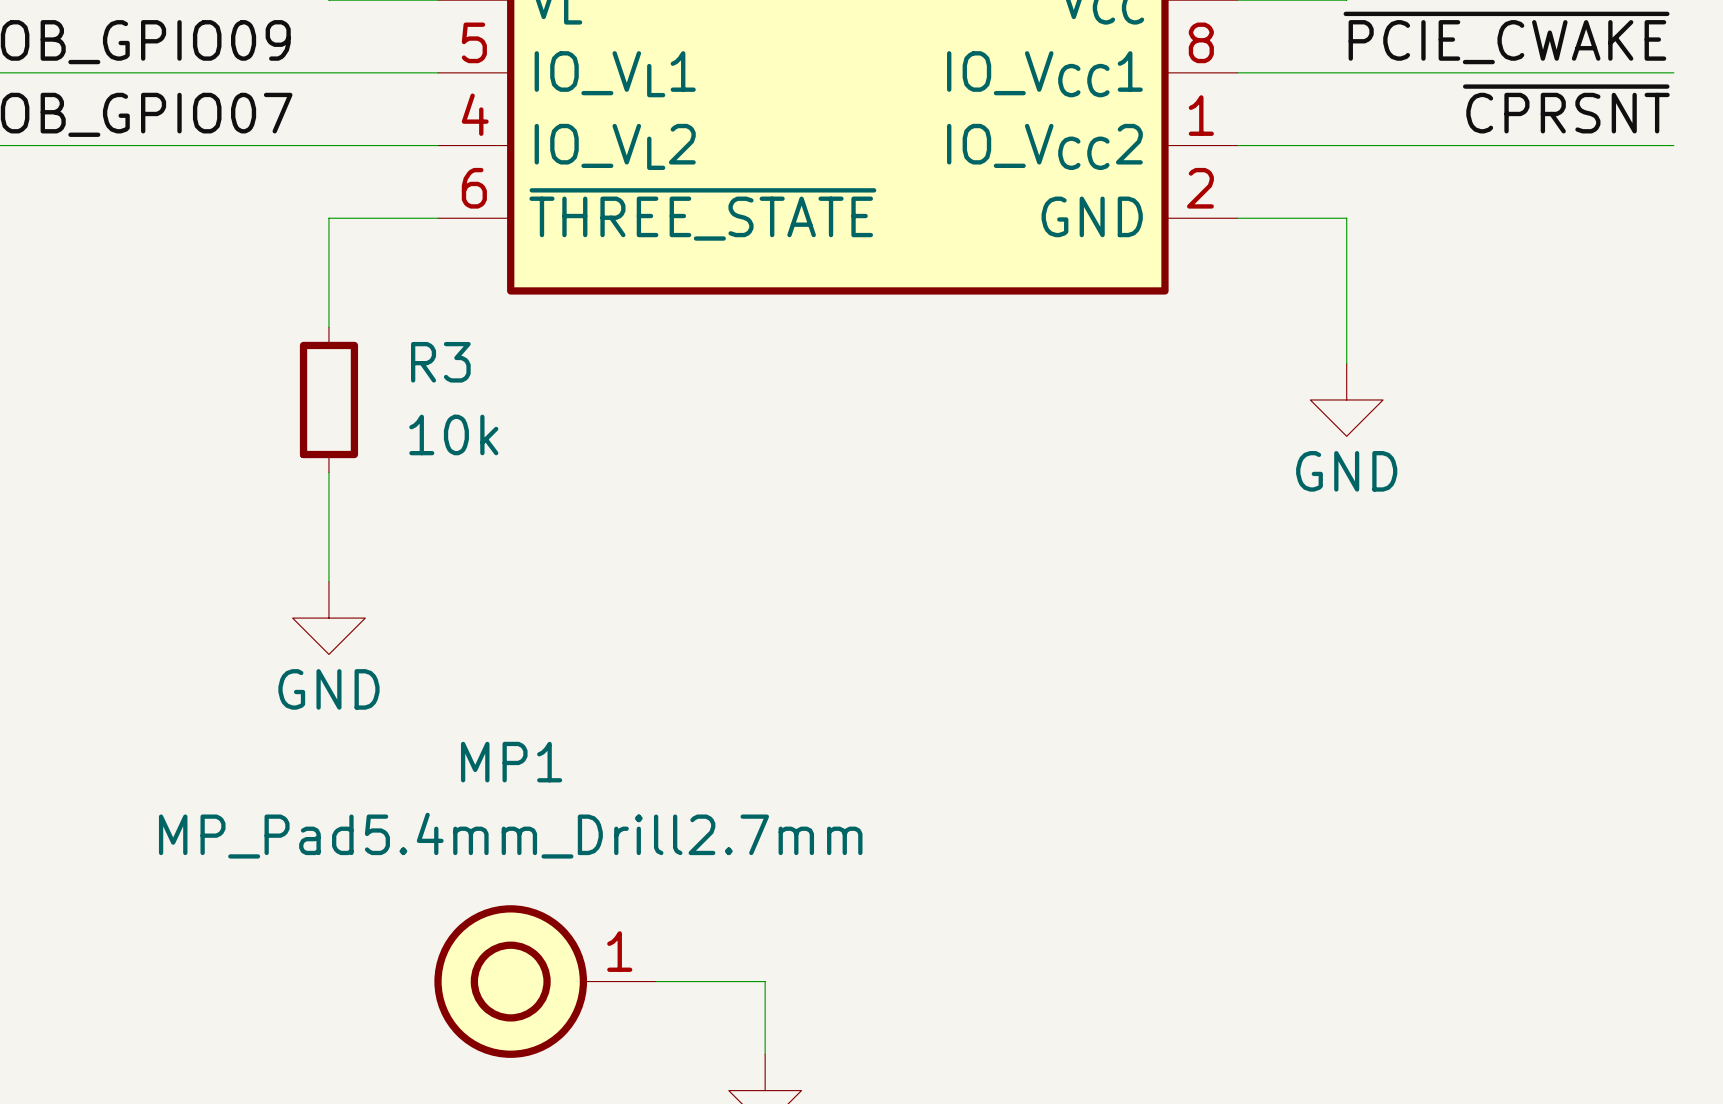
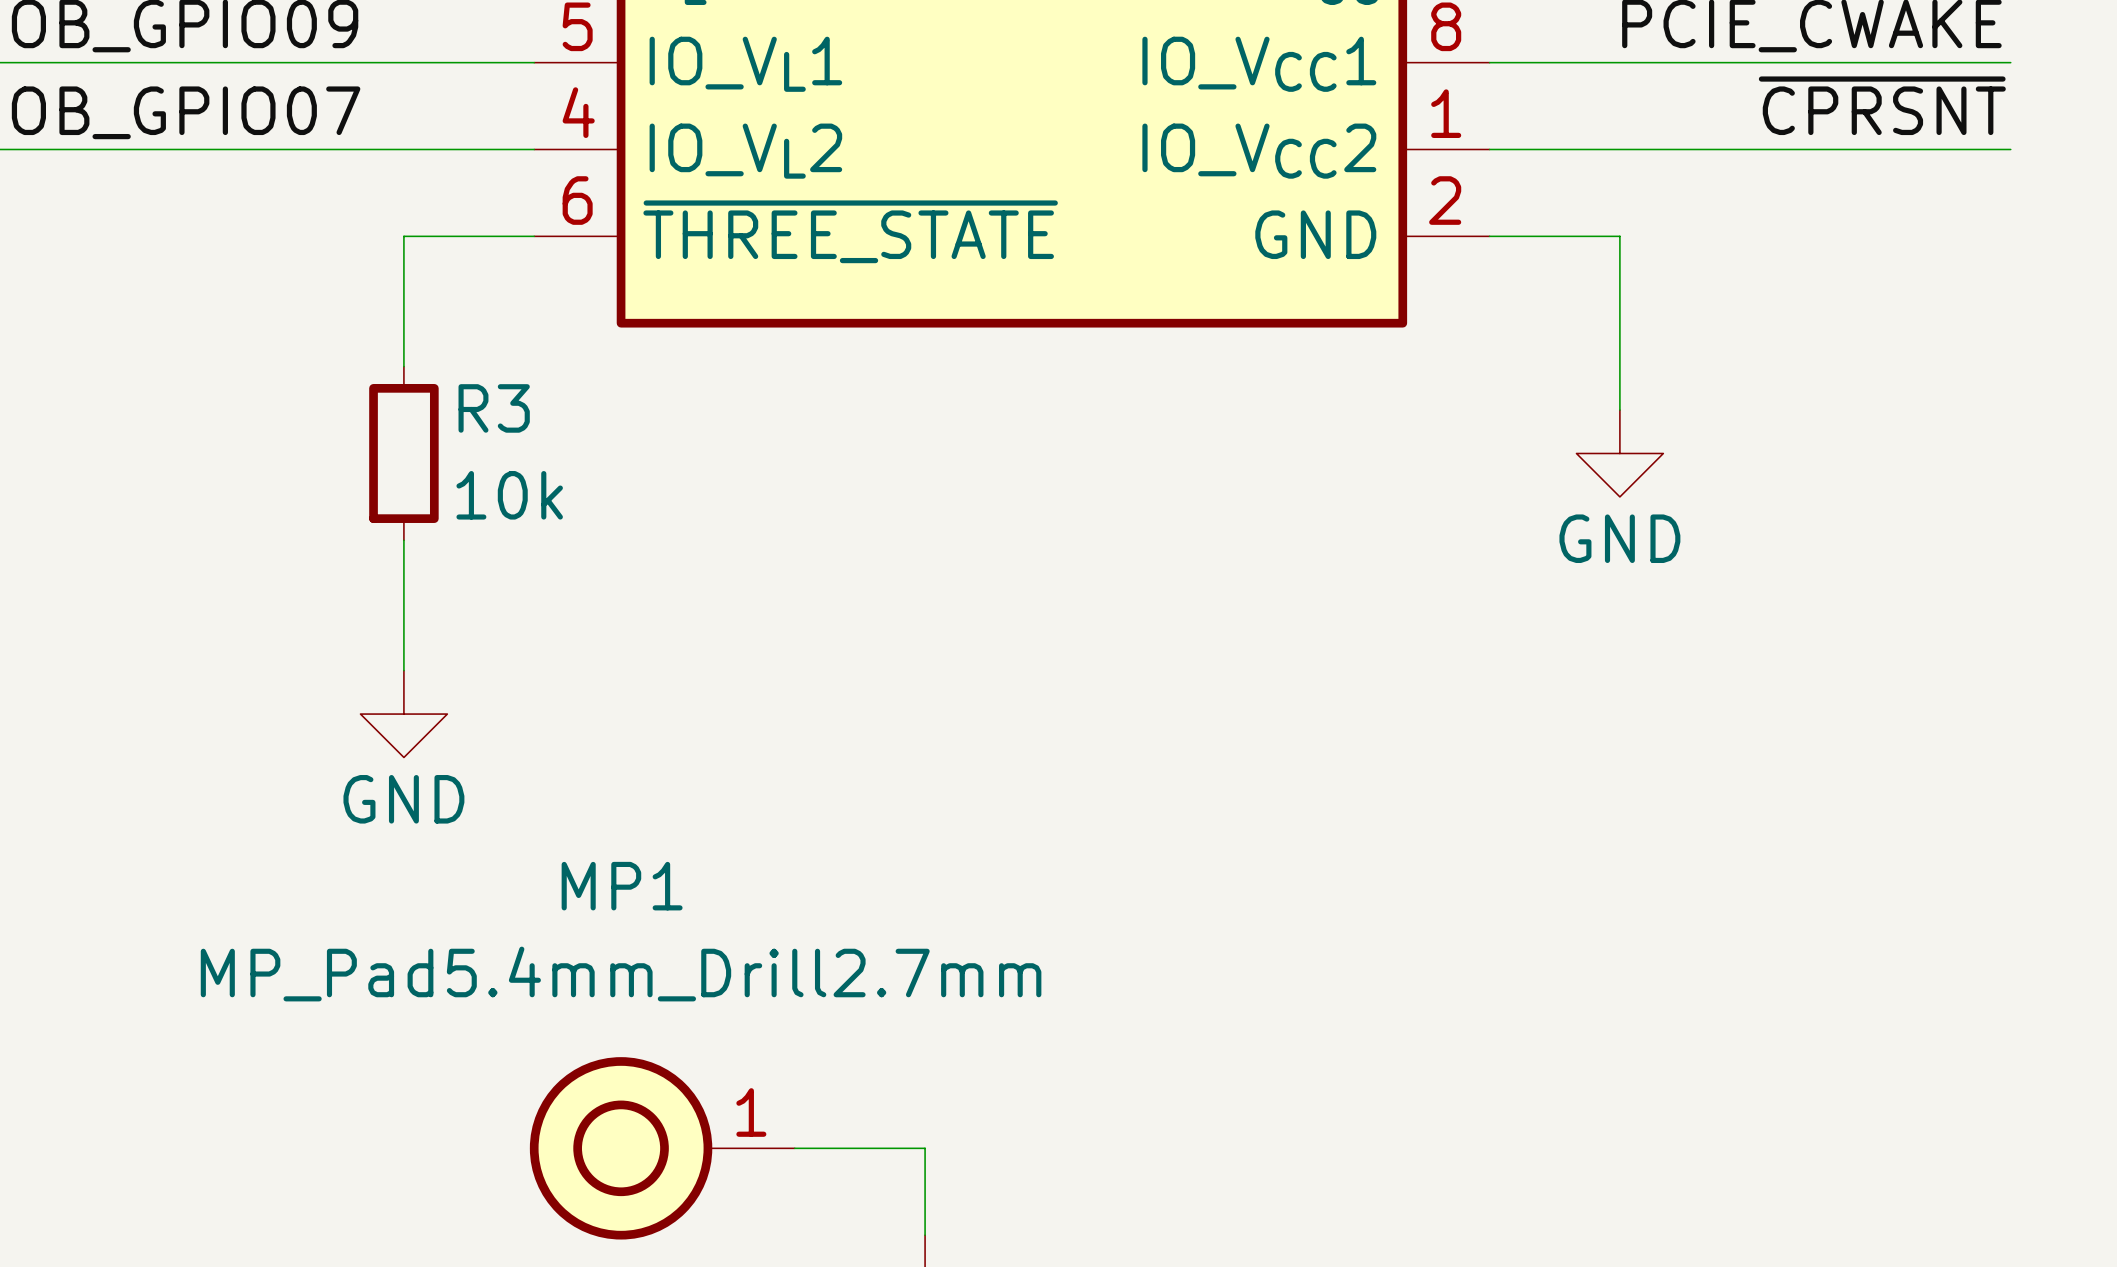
R3 name position: R3 (440, 362) -> R3 (494, 408)
R3 text position: 10k (453, 434) -> 10k (509, 495)

